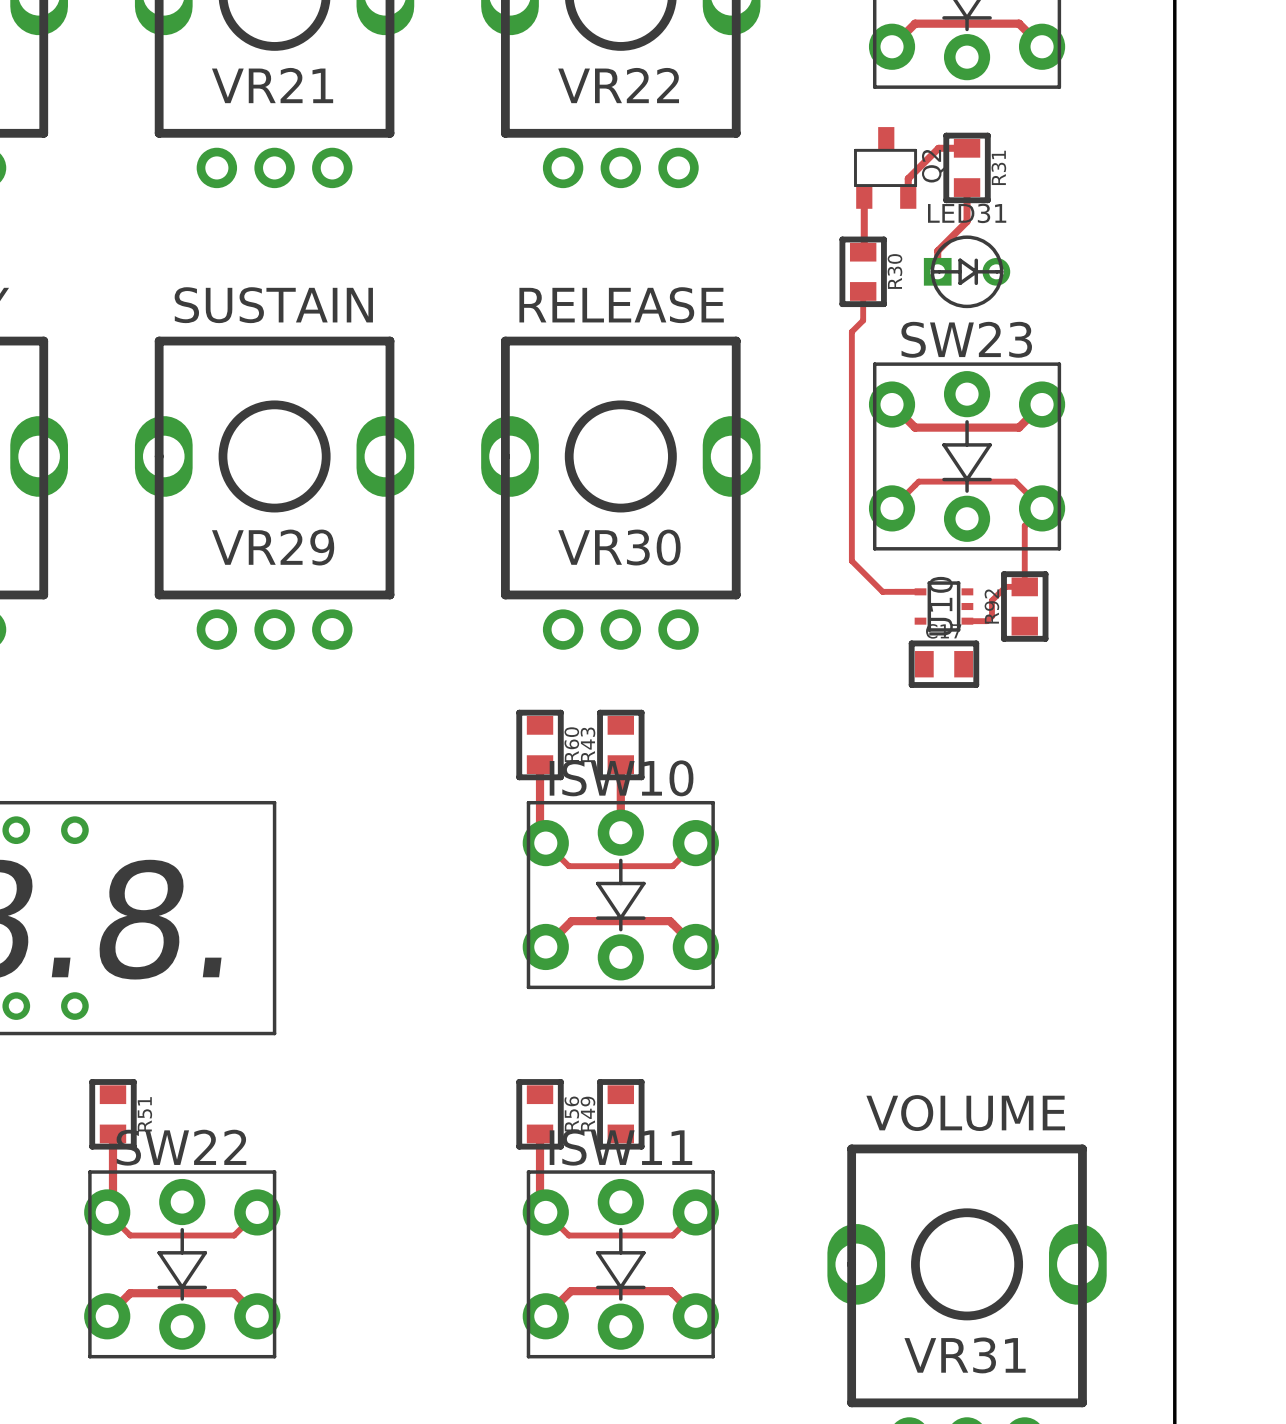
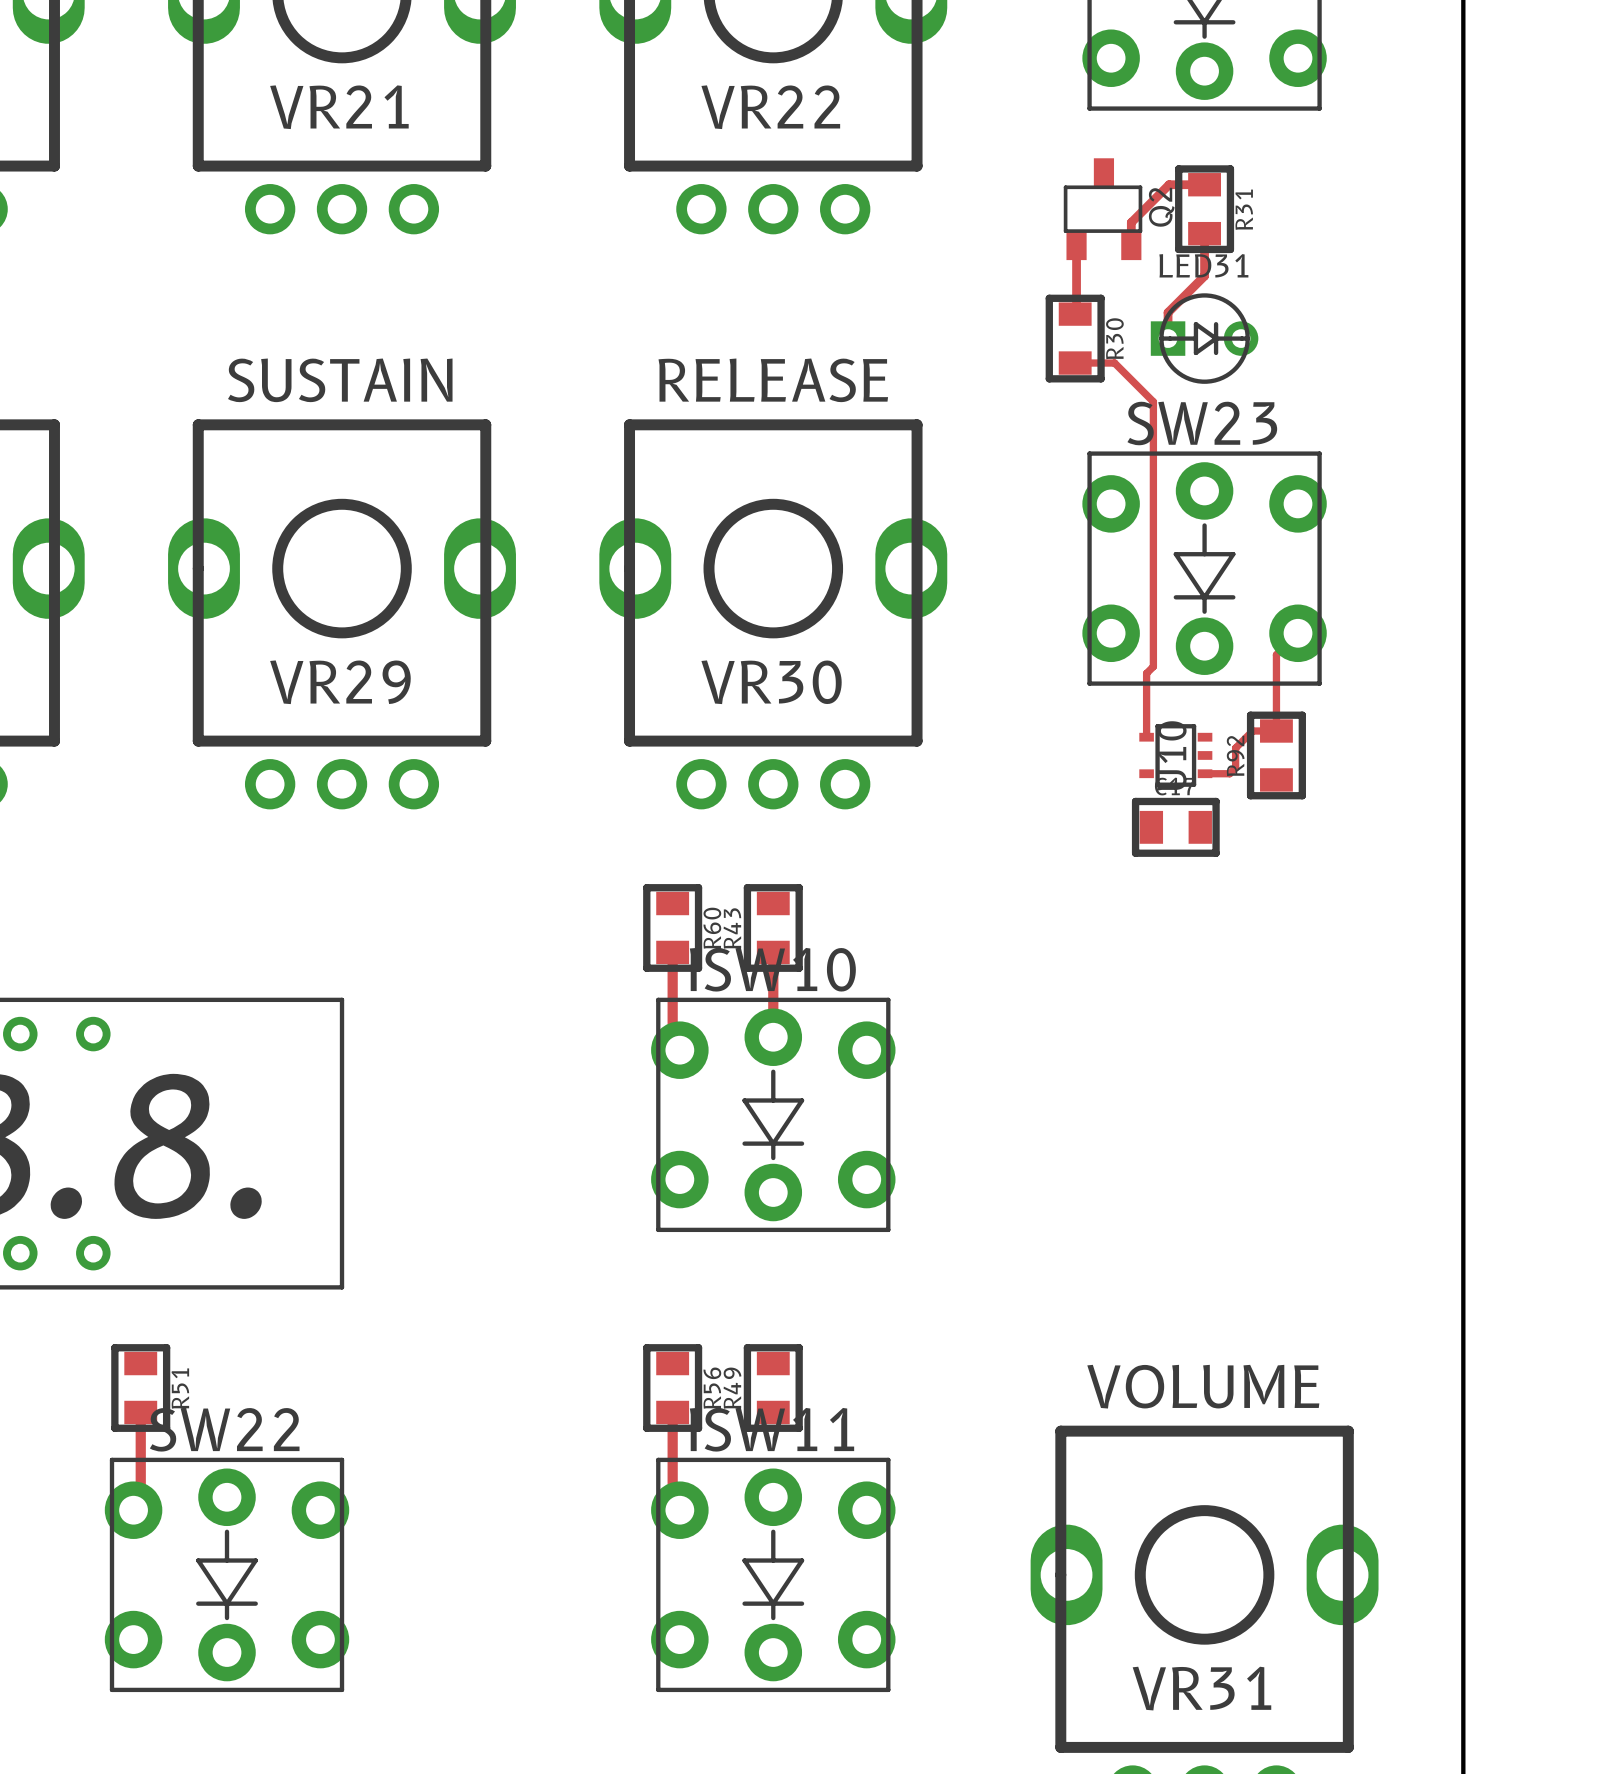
track: (892, 46) (915, 23) (1018, 23) (1042, 46) -> none
track: (863, 291) (863, 320) (851, 331) (851, 561) (882, 591) (920, 591) -> (1075, 363) (1114, 363) (1153, 401) (1153, 666) (1146, 673) (1146, 737)
track: (892, 404) (915, 427) (1018, 427) (1042, 404) -> none
track: (892, 508) (918, 481) (1015, 481) (1042, 508) -> none
track: (545, 843) (568, 866) (672, 866) (695, 843) -> none
track: (545, 946) (571, 921) (669, 921) (695, 946) -> none
track: (107, 1212) (130, 1235) (234, 1235) (257, 1212) -> none
track: (545, 1212) (568, 1235) (672, 1235) (695, 1212) -> none
track: (107, 1316) (130, 1293) (234, 1293) (257, 1316) -> none
track: (545, 1316) (570, 1291) (670, 1291) (695, 1316) -> none

